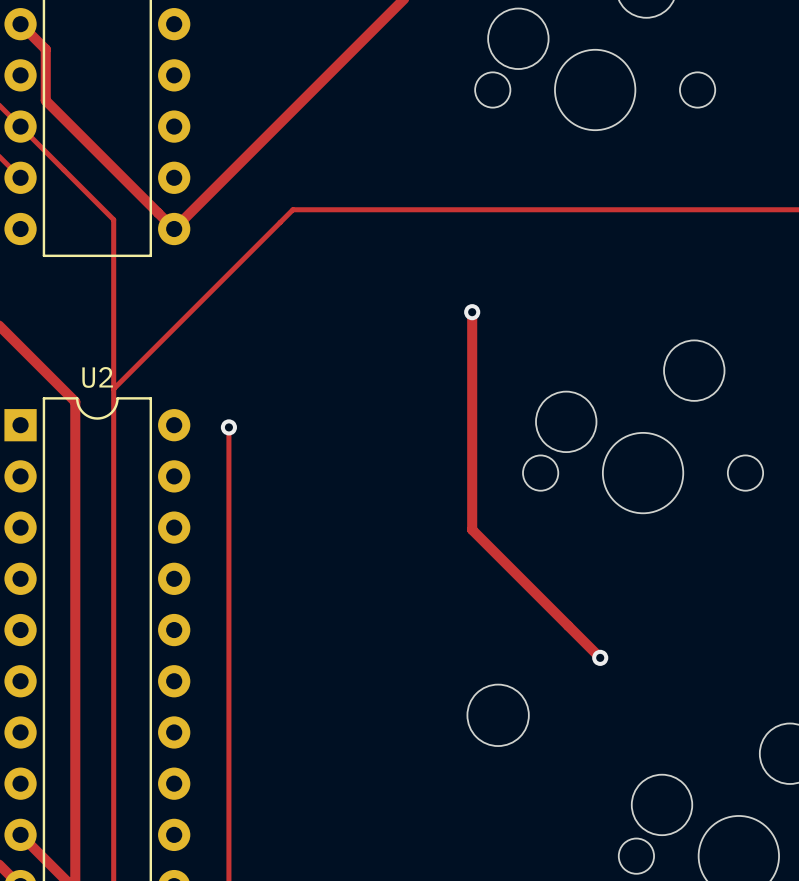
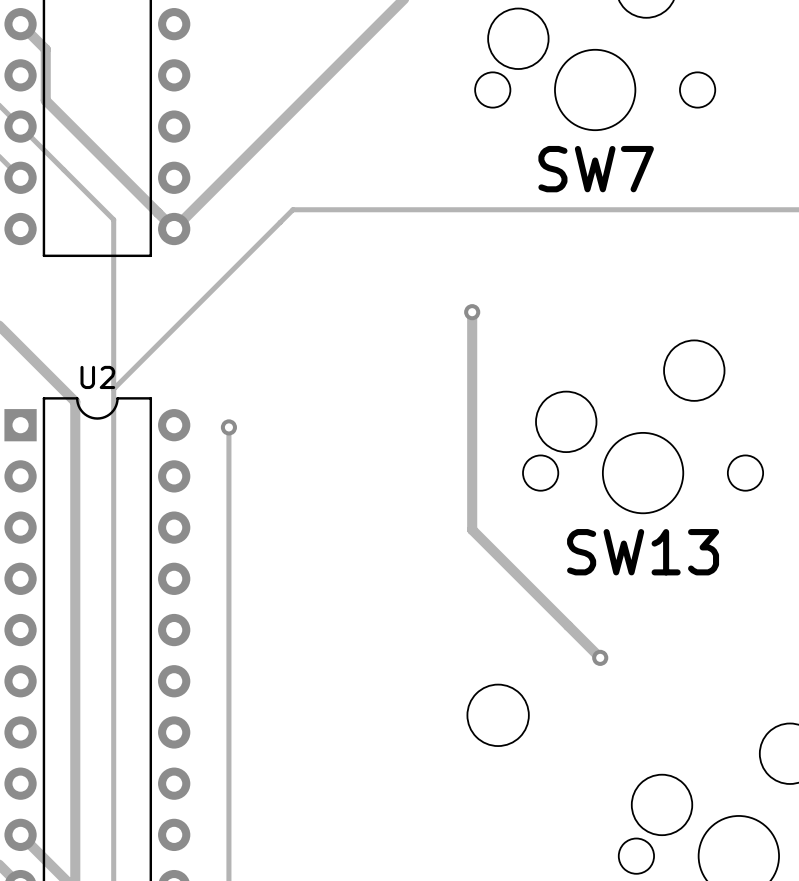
SW7 name: none -> SW7 (596, 169)
SW13 name: none -> SW13 (643, 552)

